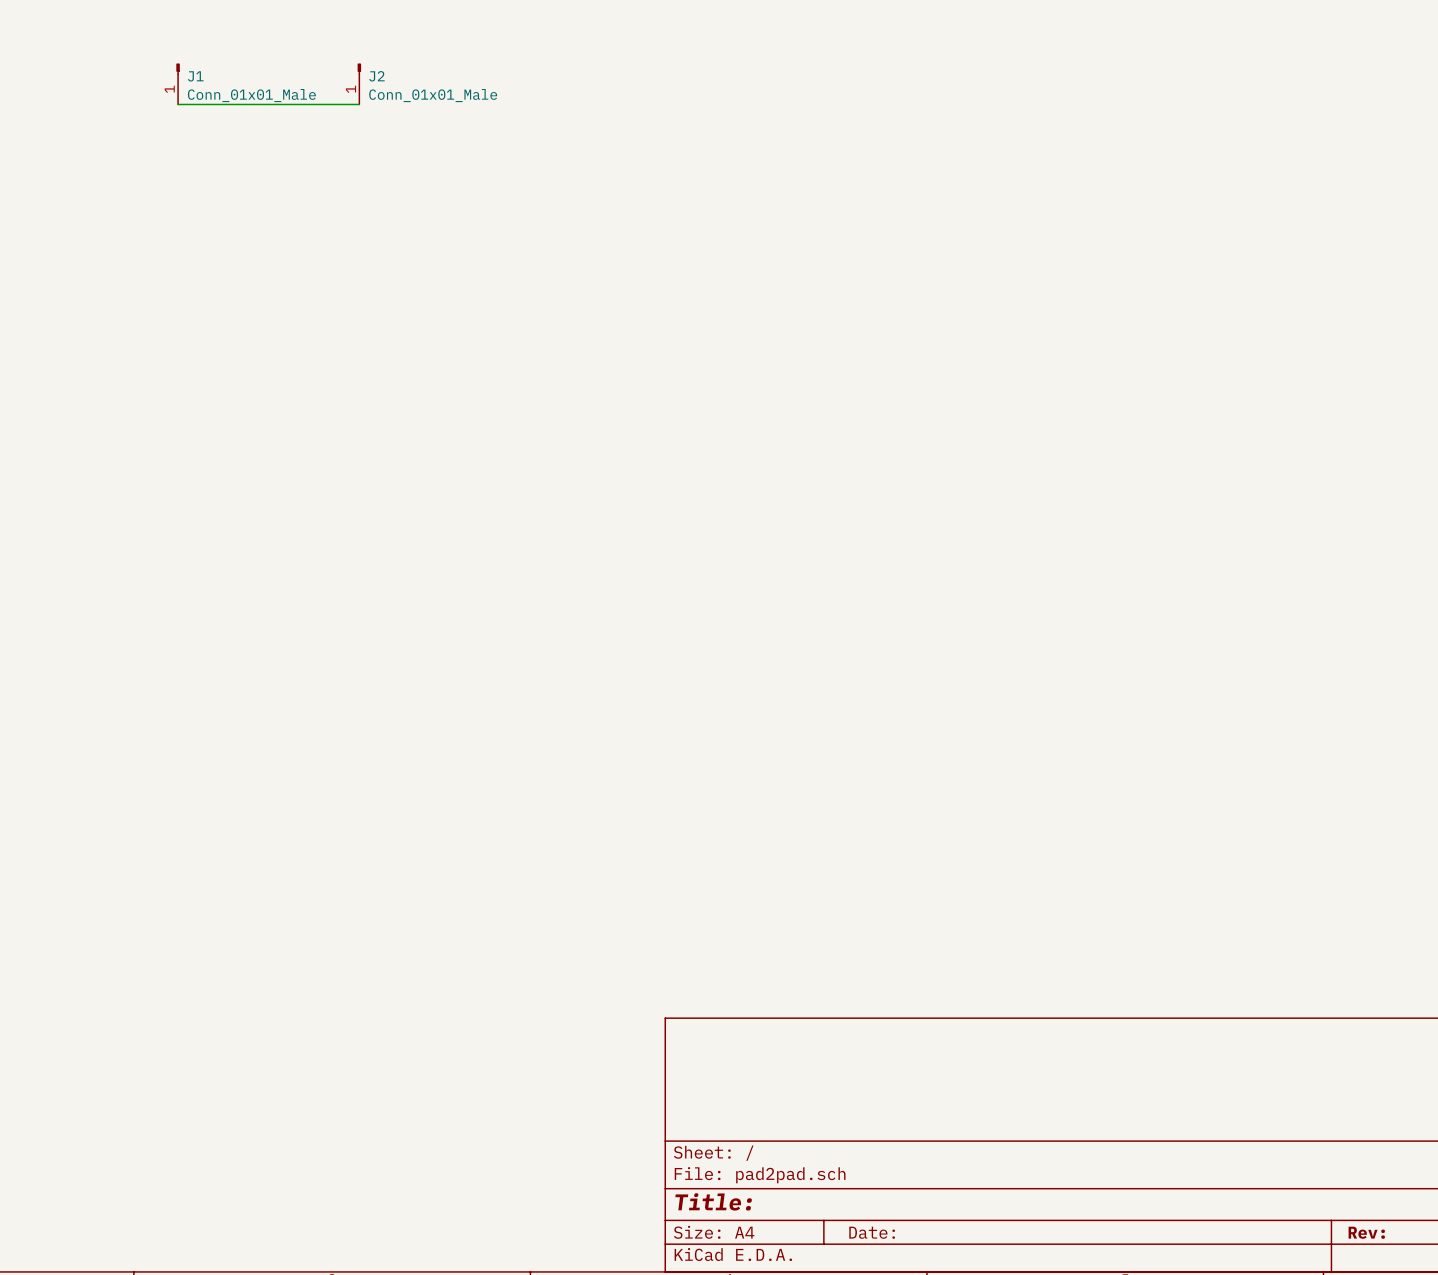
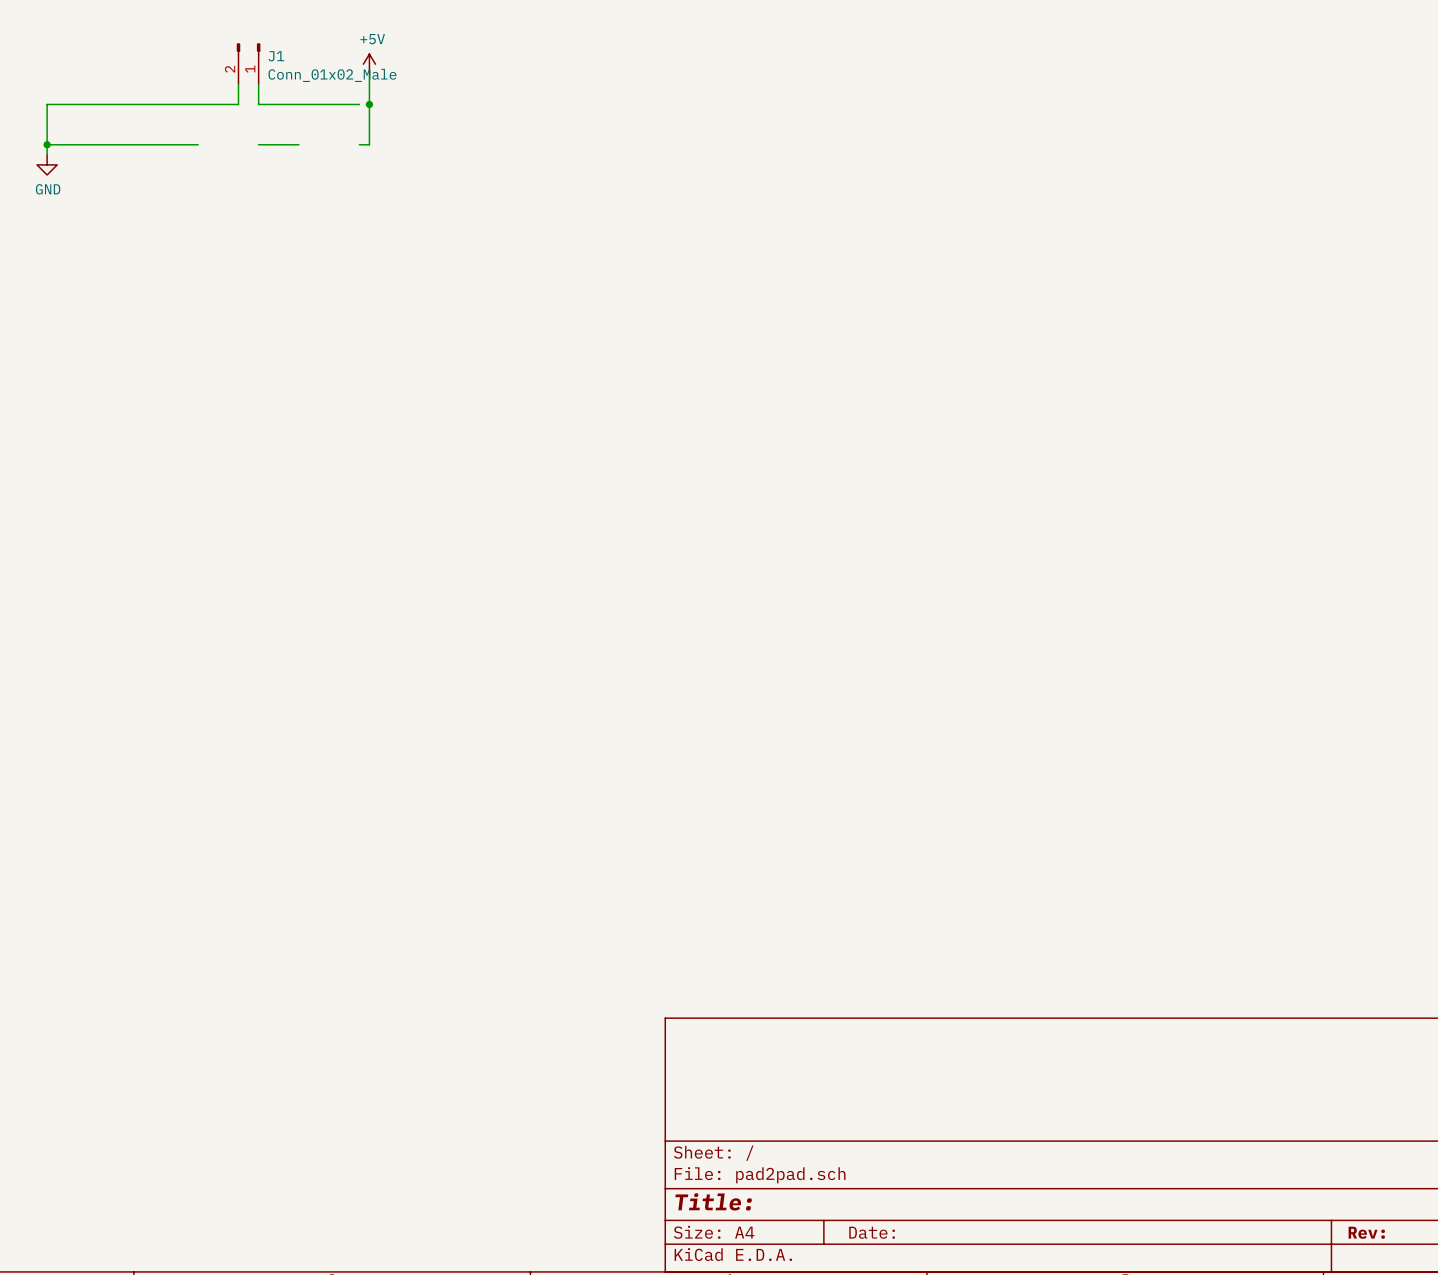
J1 symbol: [176, 63, 180, 105] -> [236, 43, 261, 85]
power symbol: none -> +5V (369, 64)
wire: none -> (369, 74) (369, 144) (359, 144)
wire: none -> (258, 84) (258, 104)
J2: Conn_01x01_Male (359, 84) -> none
J1 value: Conn_01x01_Male (251, 95) -> Conn_01x02_Male (332, 75)
wire: none -> (178, 104) (47, 104) (47, 154)
wire: (238, 104) (258, 104) -> (238, 104) (238, 84)
junction: none -> (369, 104)
wire: none -> (47, 144) (198, 144)
junction: none -> (47, 144)
wire: none -> (258, 144) (298, 144)
power symbol: none -> GND (47, 164)

